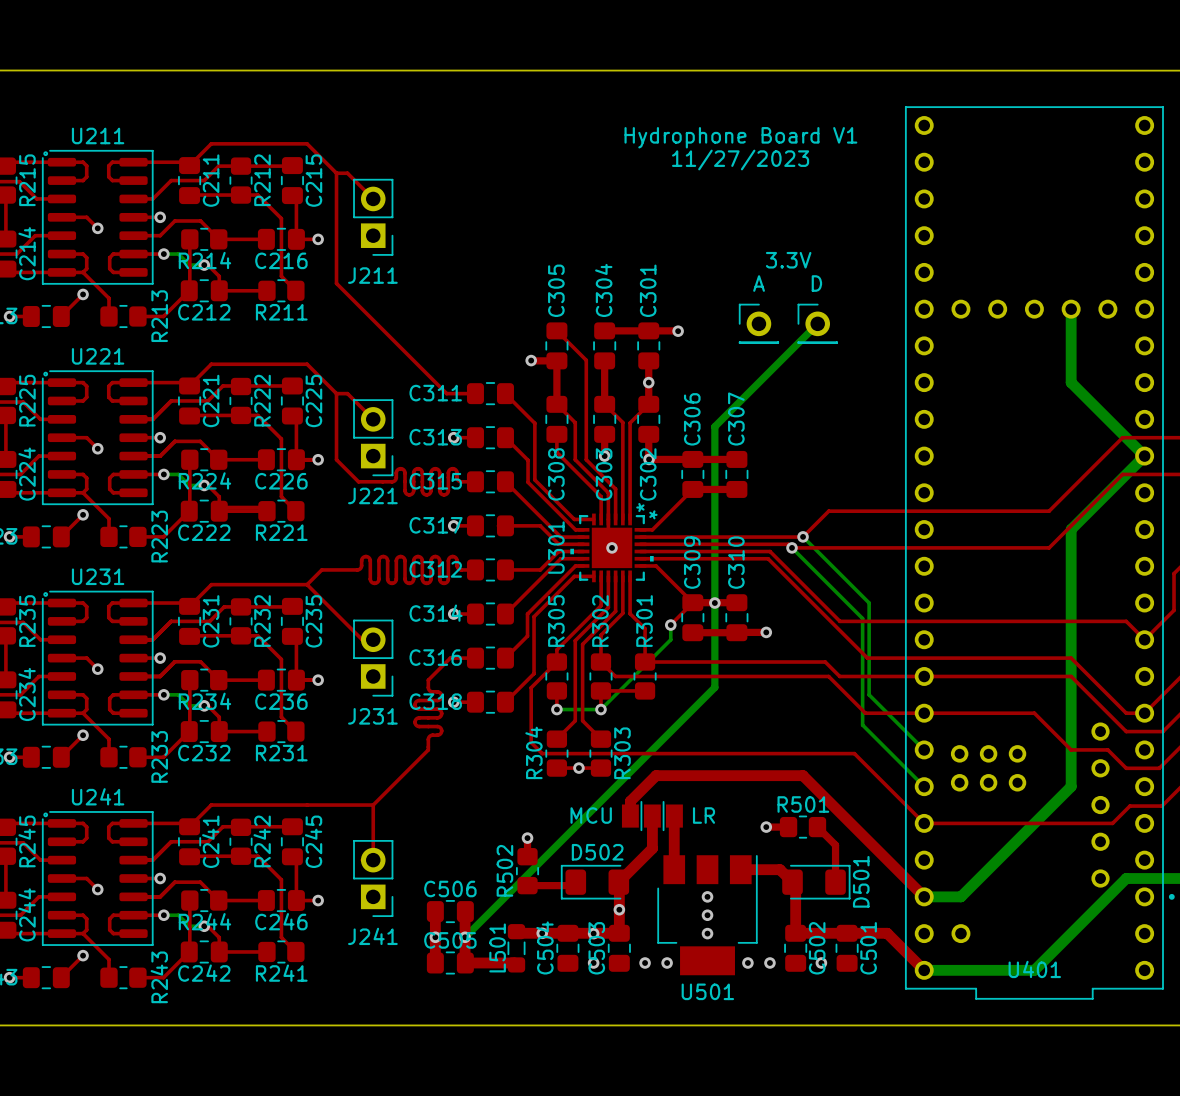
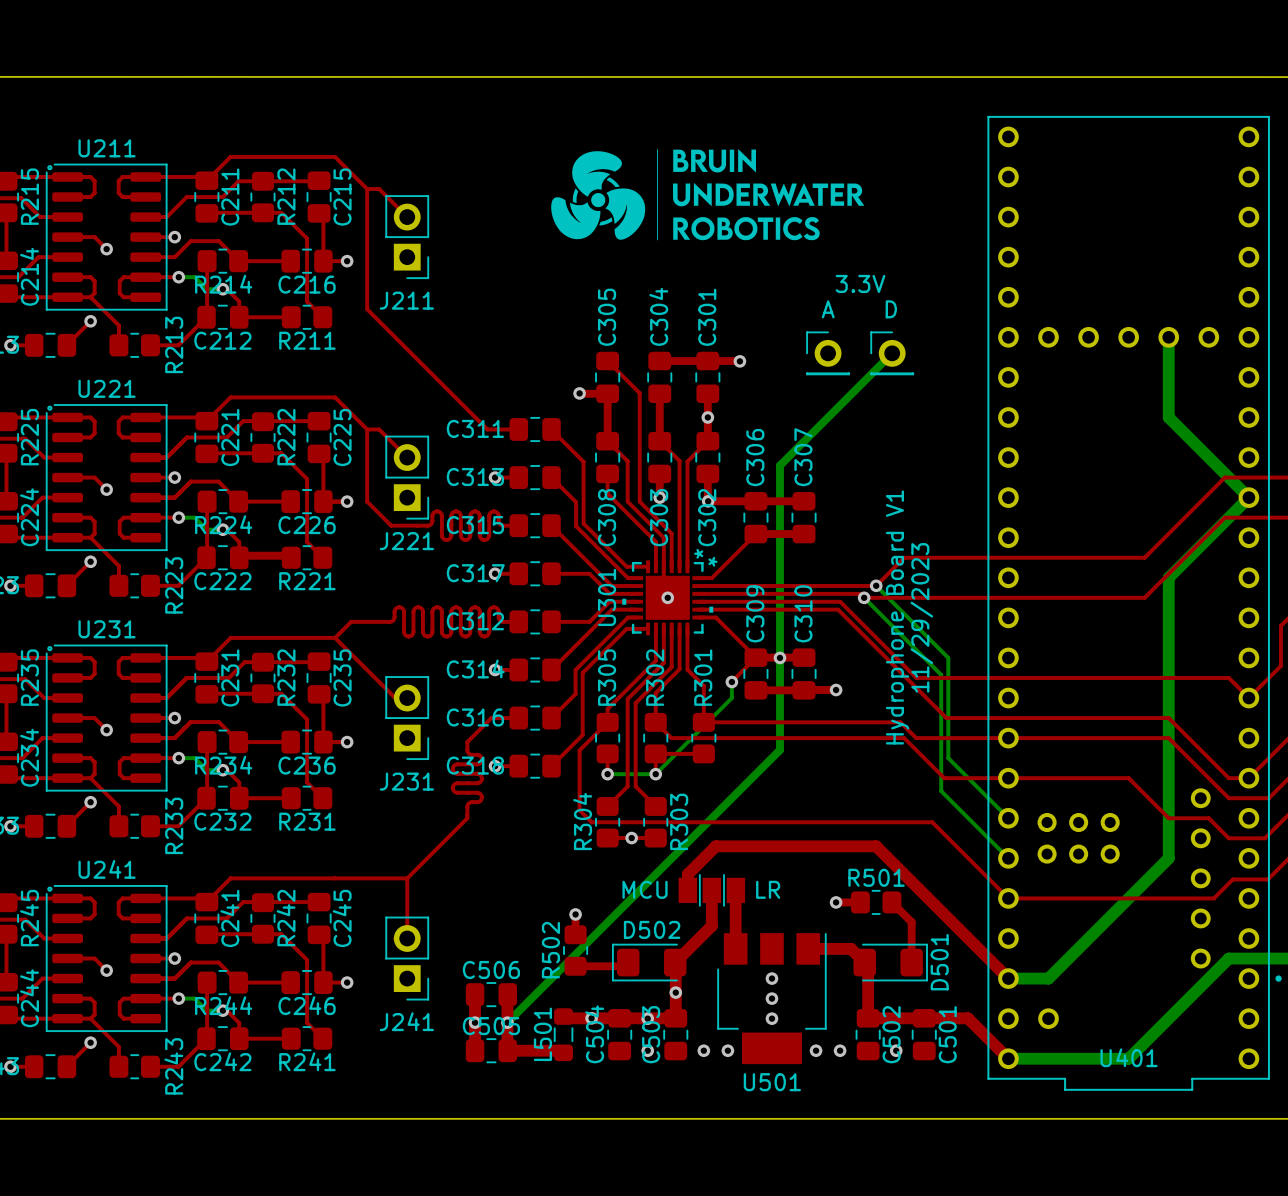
drawing: none -> [551, 149, 865, 241]
text: Hydrophone Board V1 (740, 137) -> none
text: 11/27/2023 (740, 160) -> none
text: none -> Hydrophone Board V1 (897, 617)
text: none -> 11/29/2023 (921, 617)

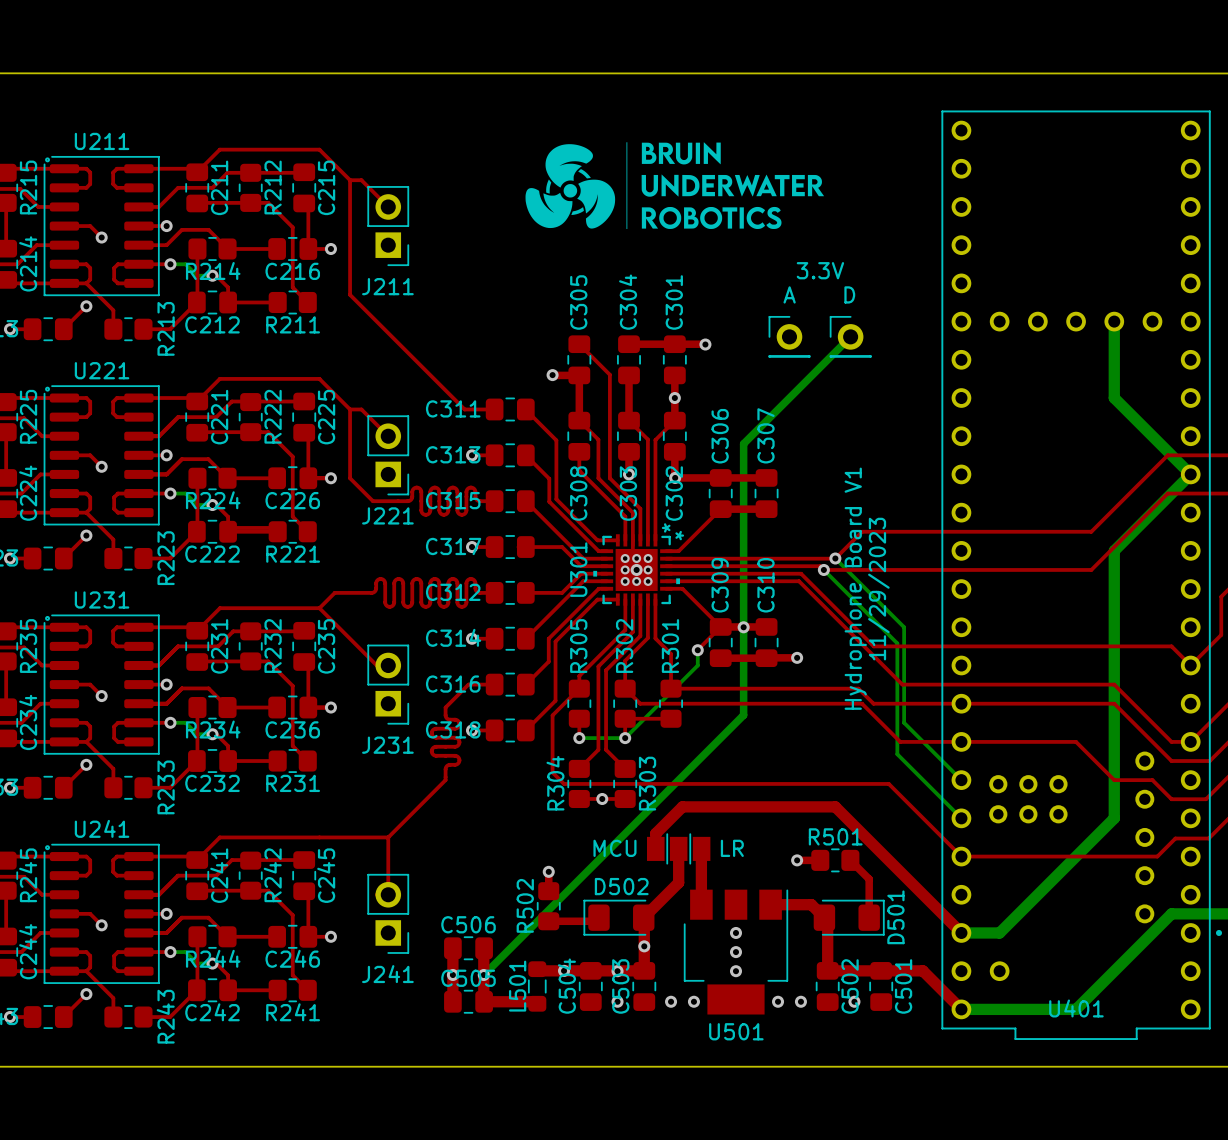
via: none -> (625, 558)
via: none -> (636, 558)
via: none -> (648, 558)
via: none -> (625, 569)
via: none -> (648, 569)
via: none -> (625, 581)
via: none -> (636, 581)
via: none -> (648, 581)

